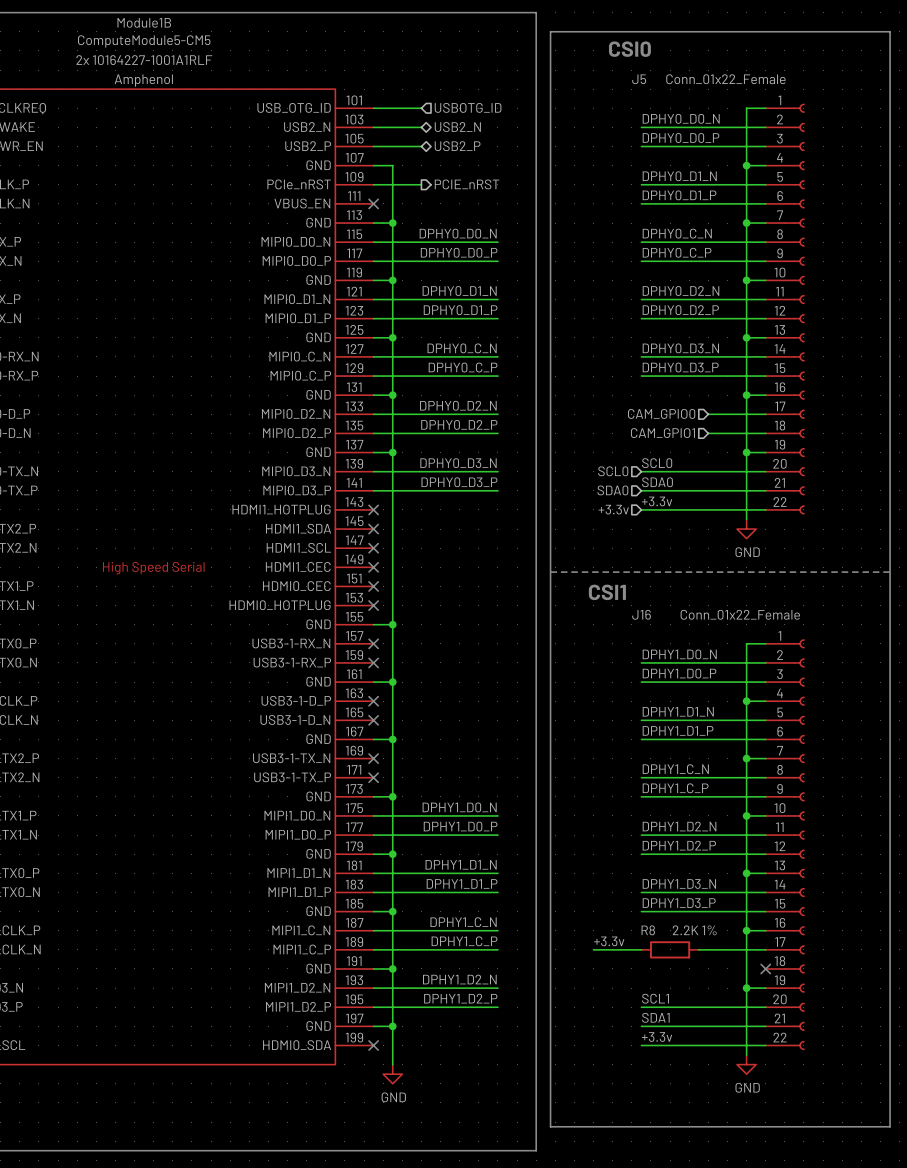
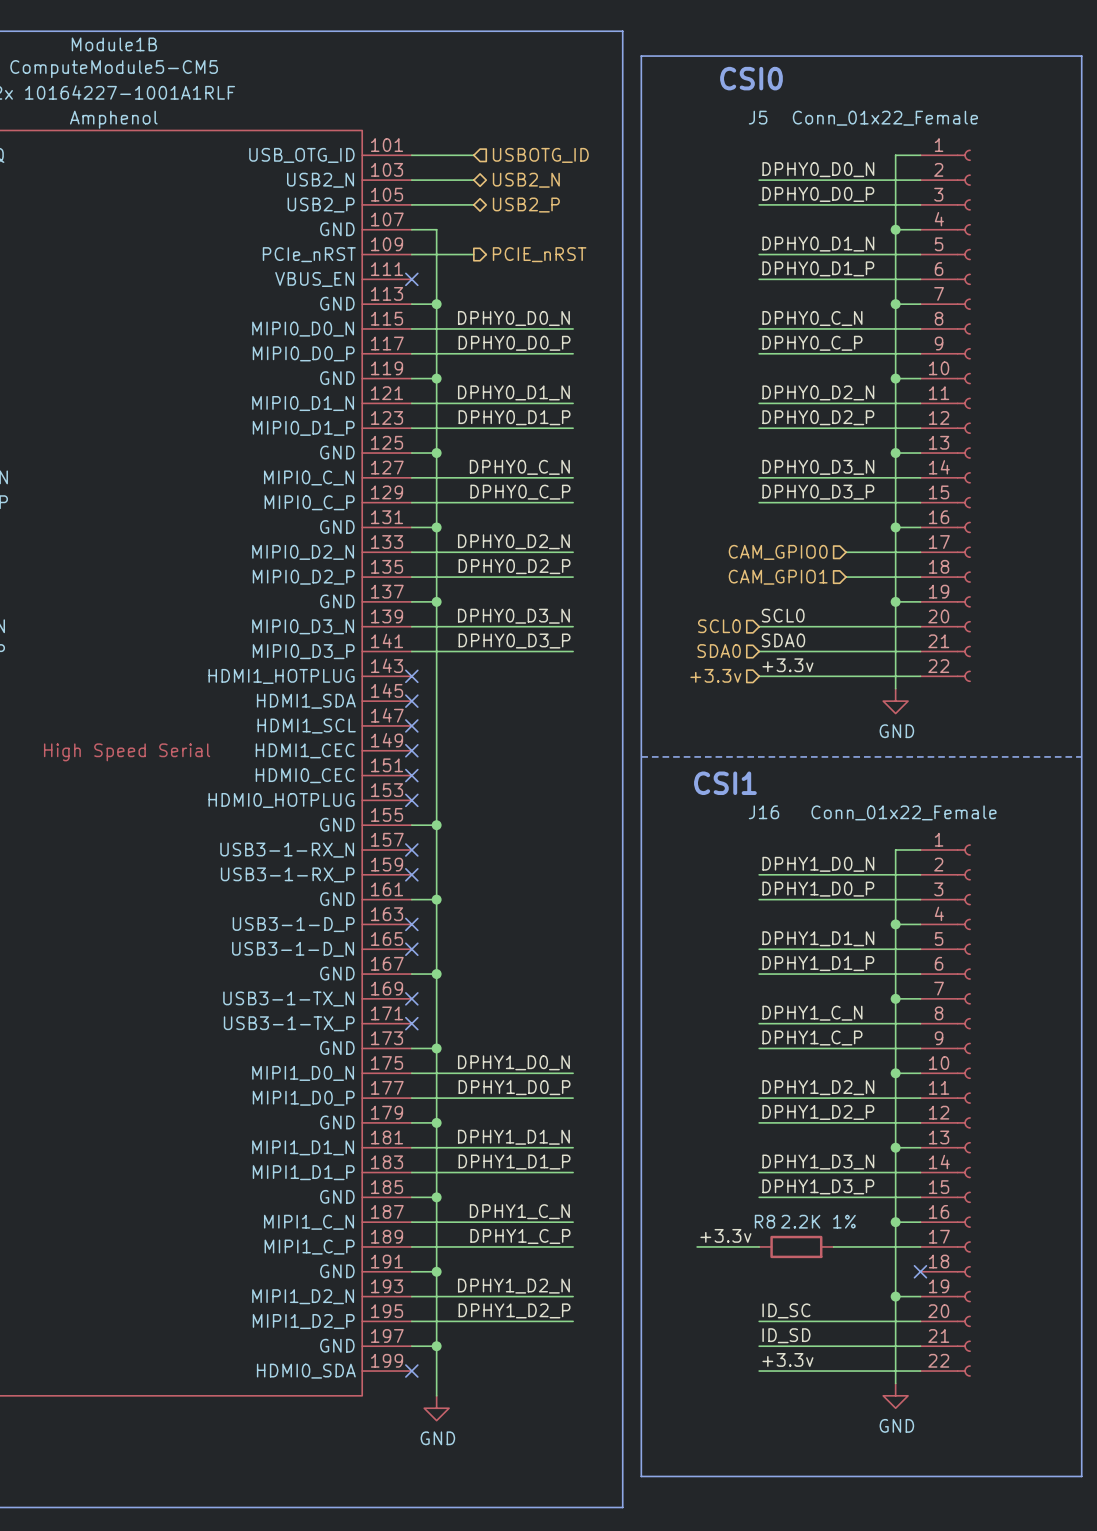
label: SCL1 (655, 998) -> ID_SC (786, 1310)
label: SDA1 (655, 1017) -> ID_SD (786, 1335)

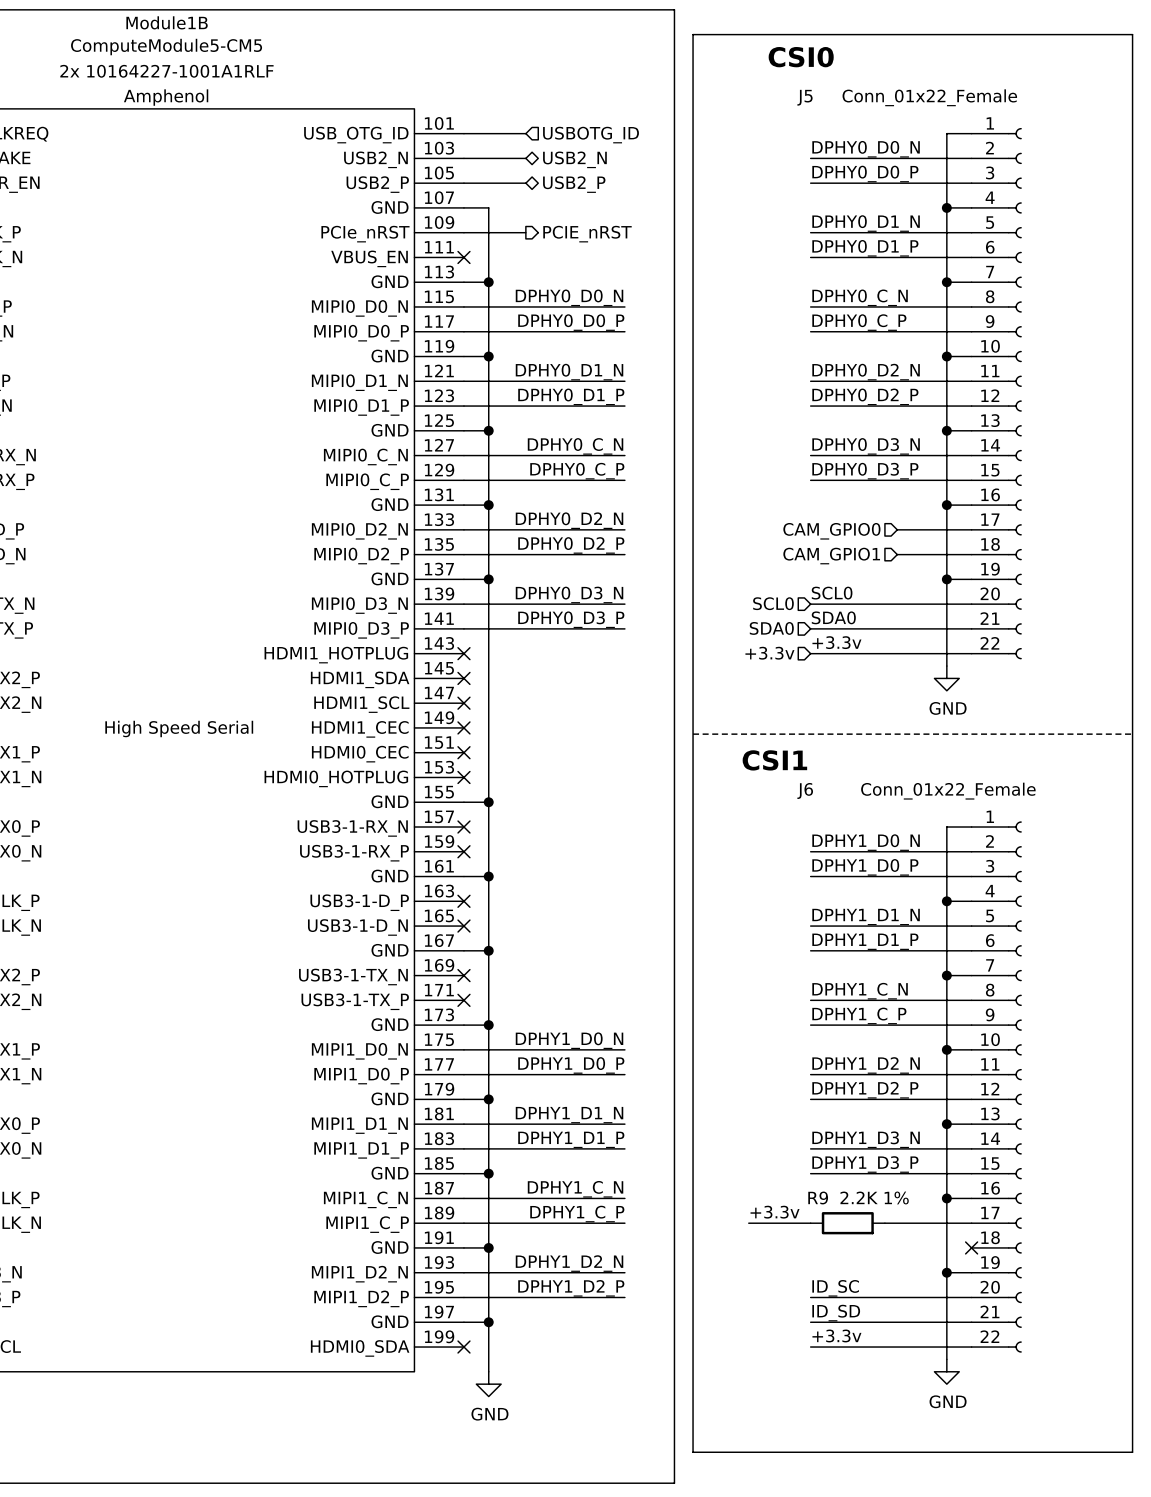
J16 name: J16 (764, 812) -> J6 (805, 790)
R8 name: R8 (764, 1221) -> R9 (818, 1197)

